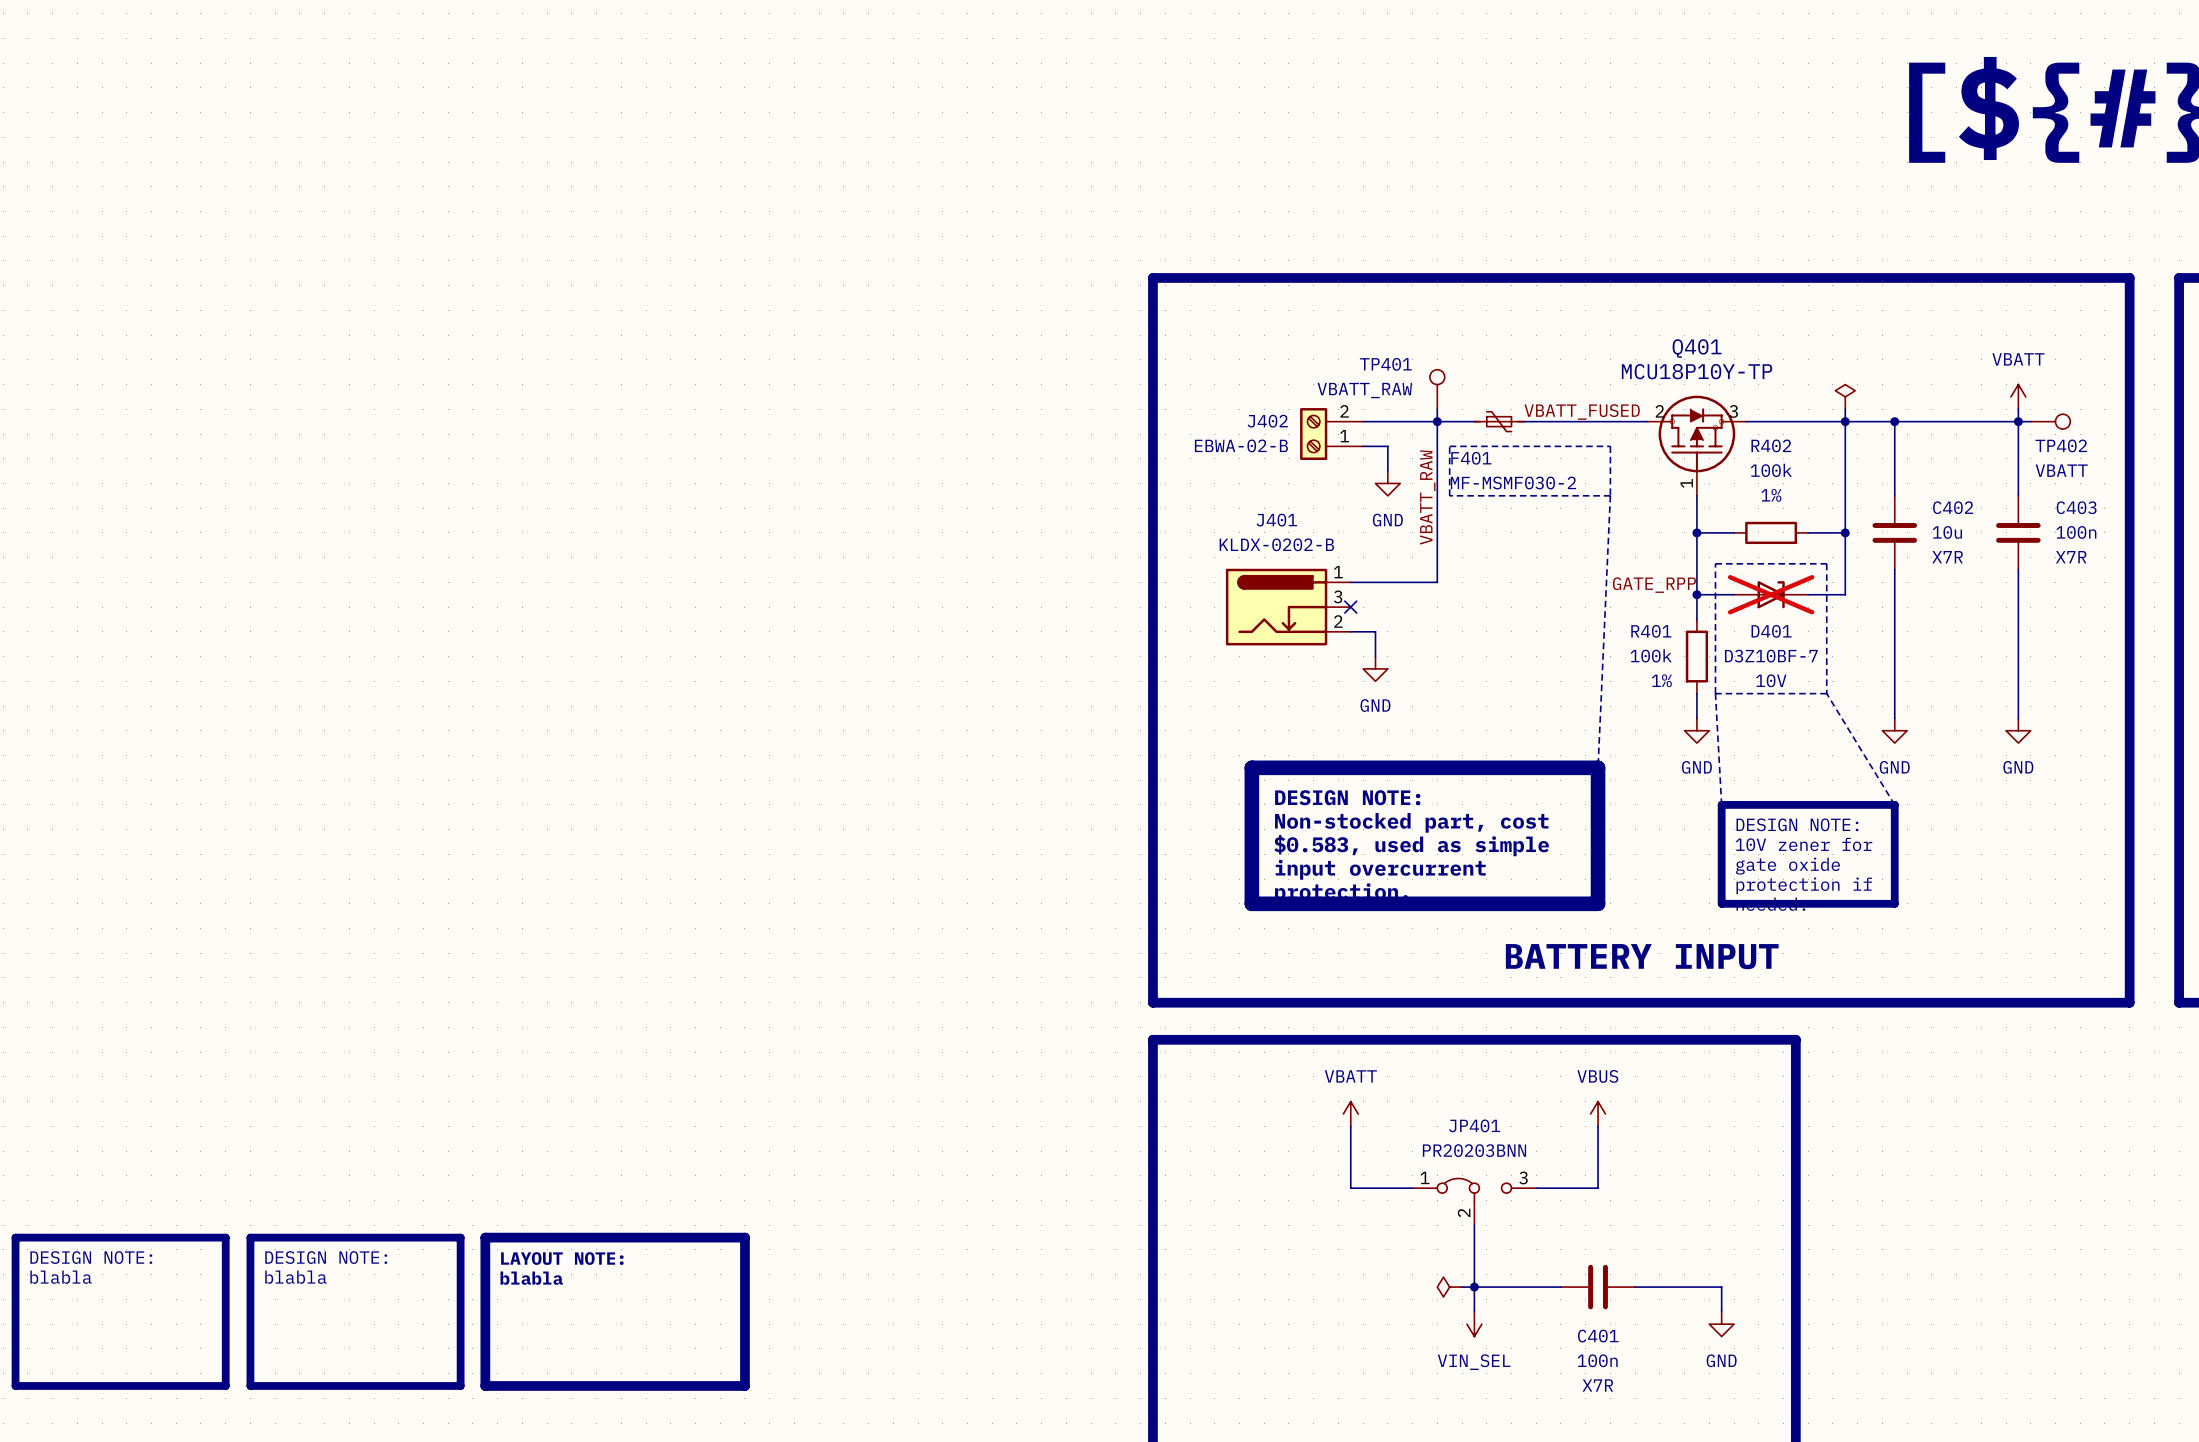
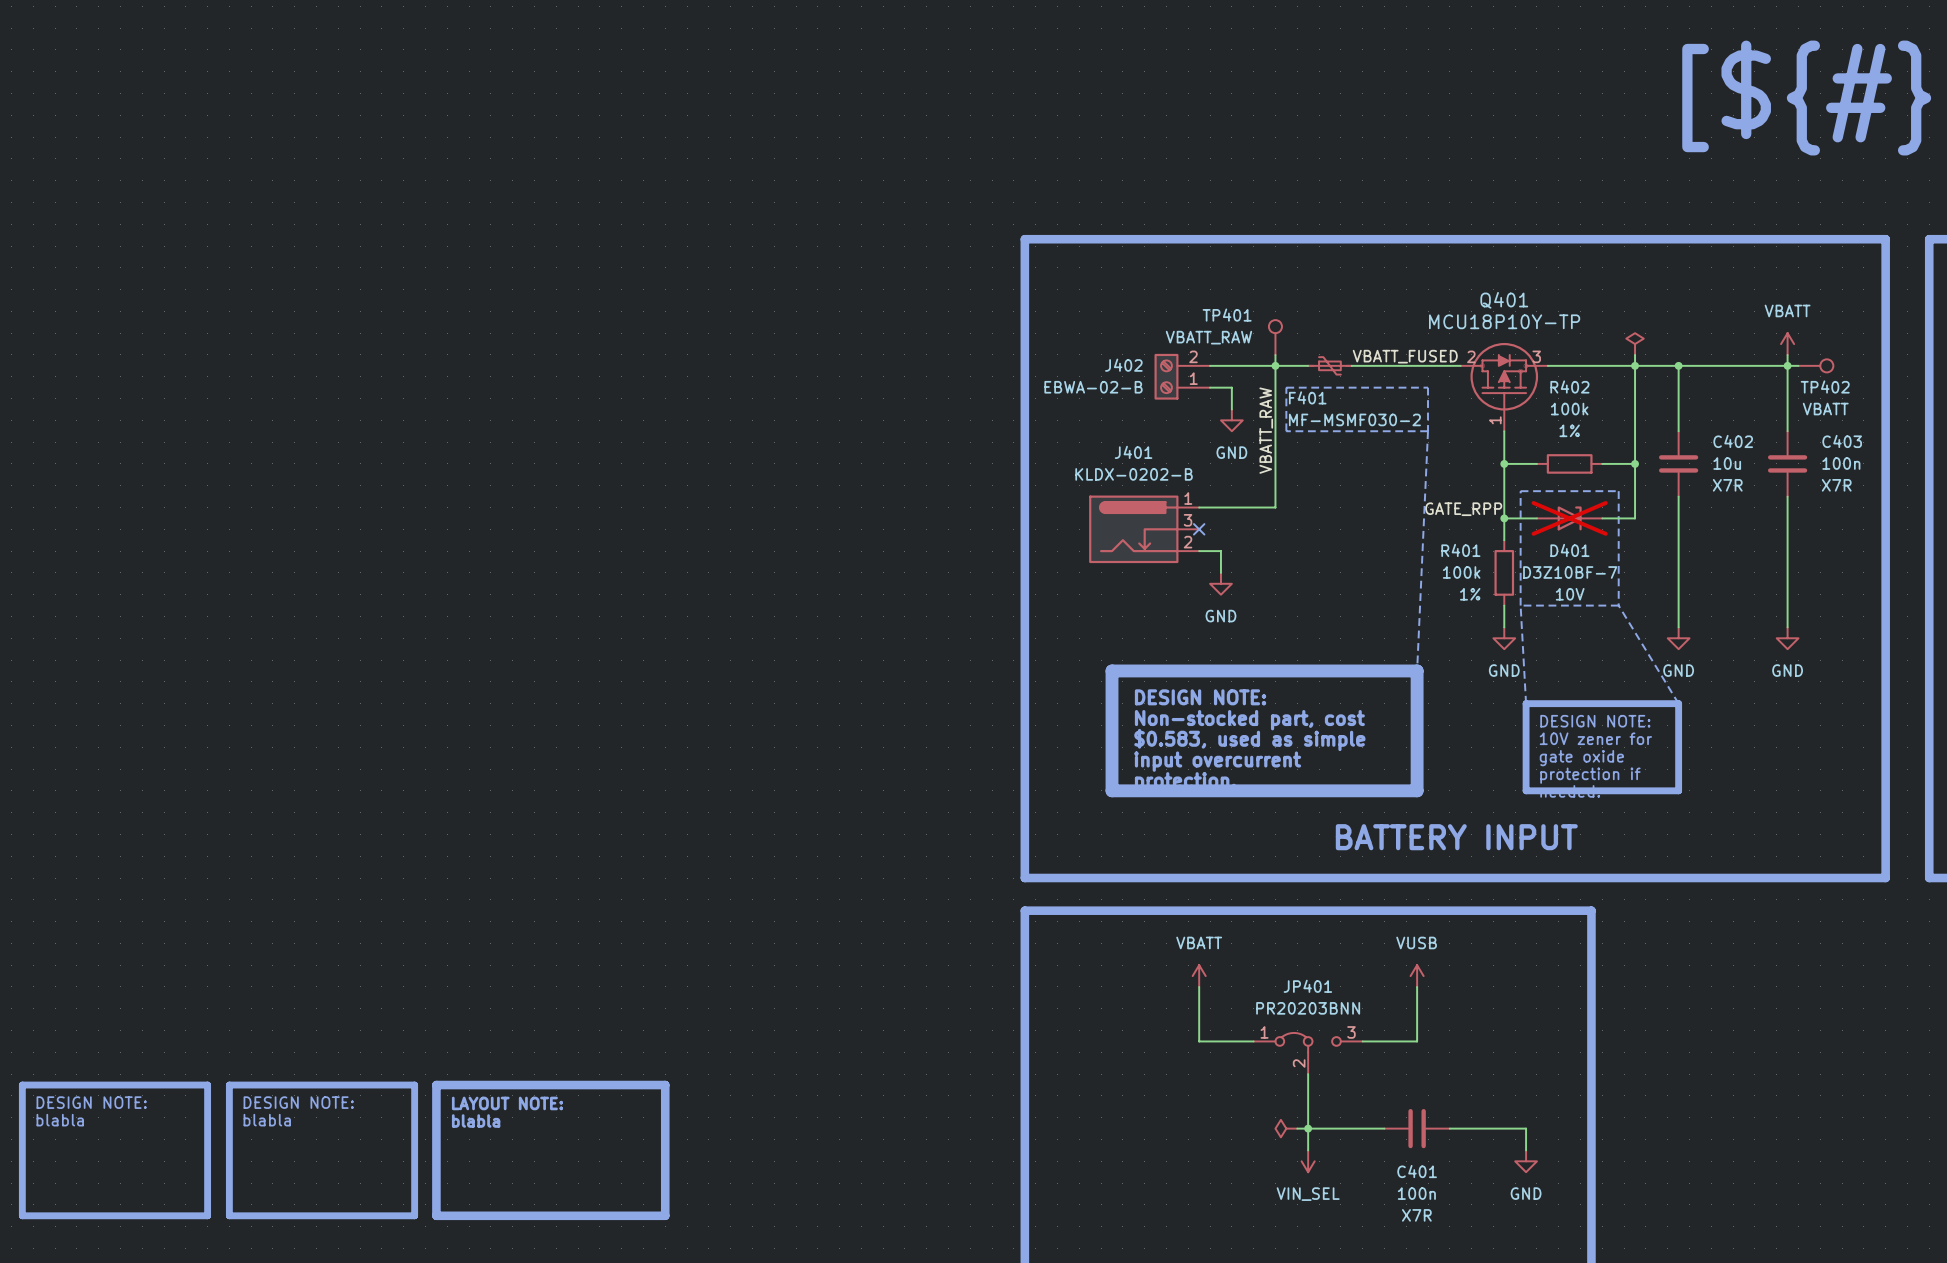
power symbol: VBUS (1598, 1113) -> VUSB (1417, 976)

